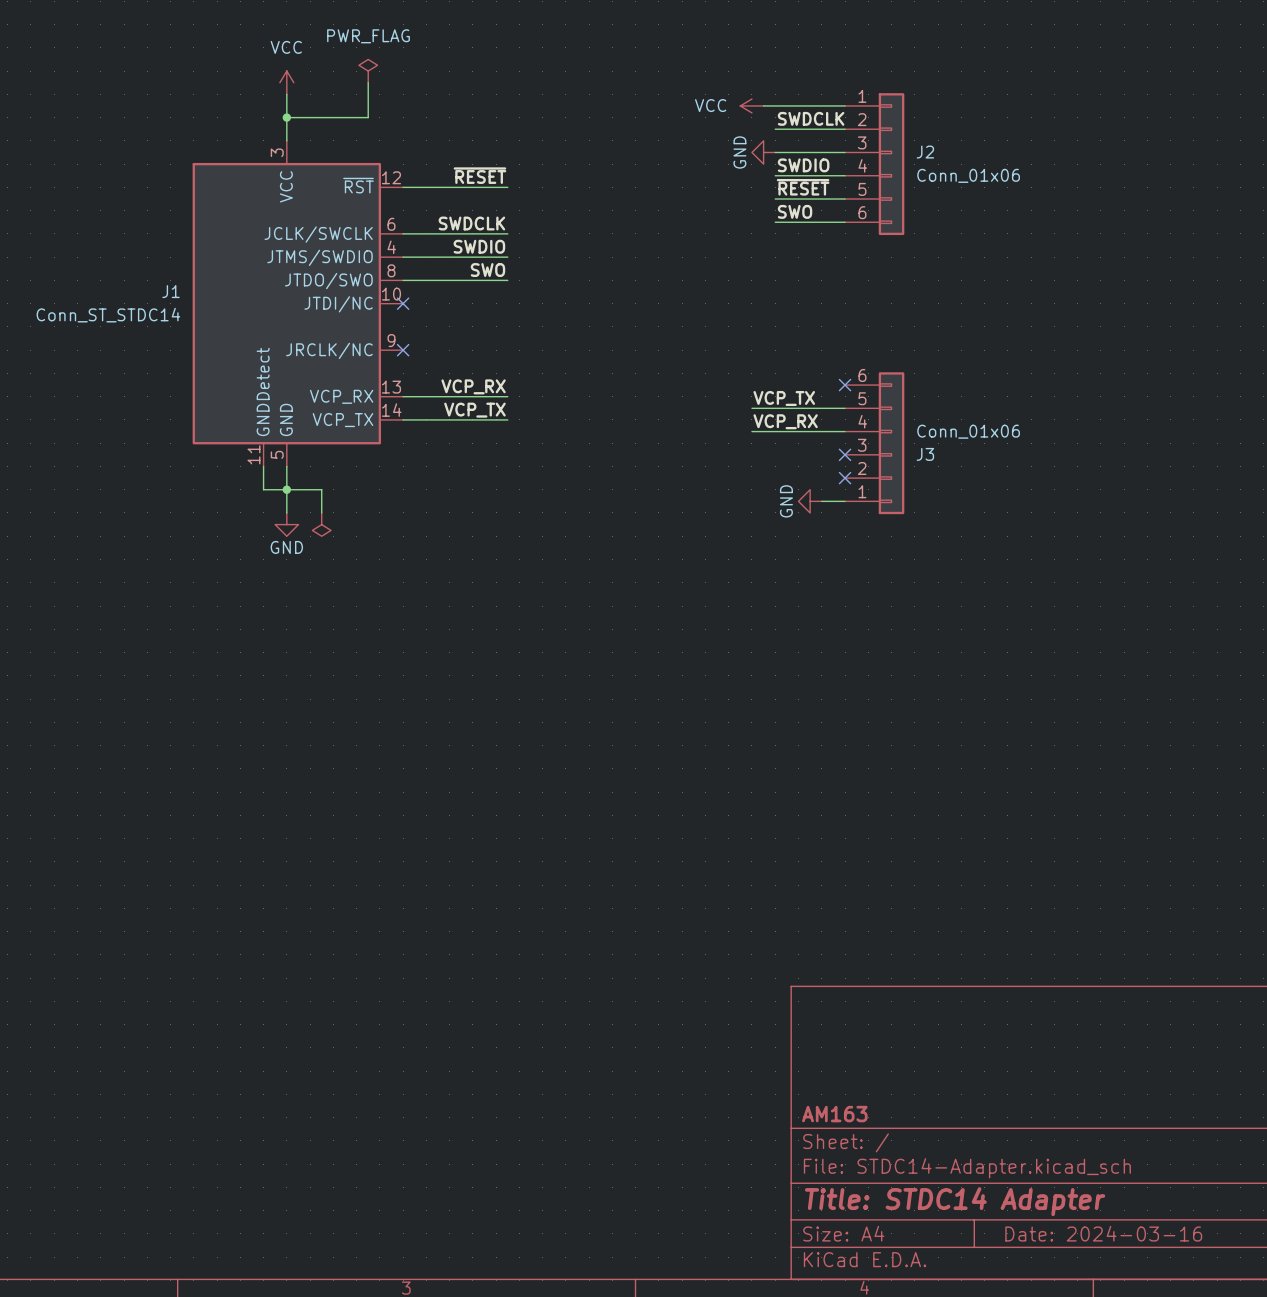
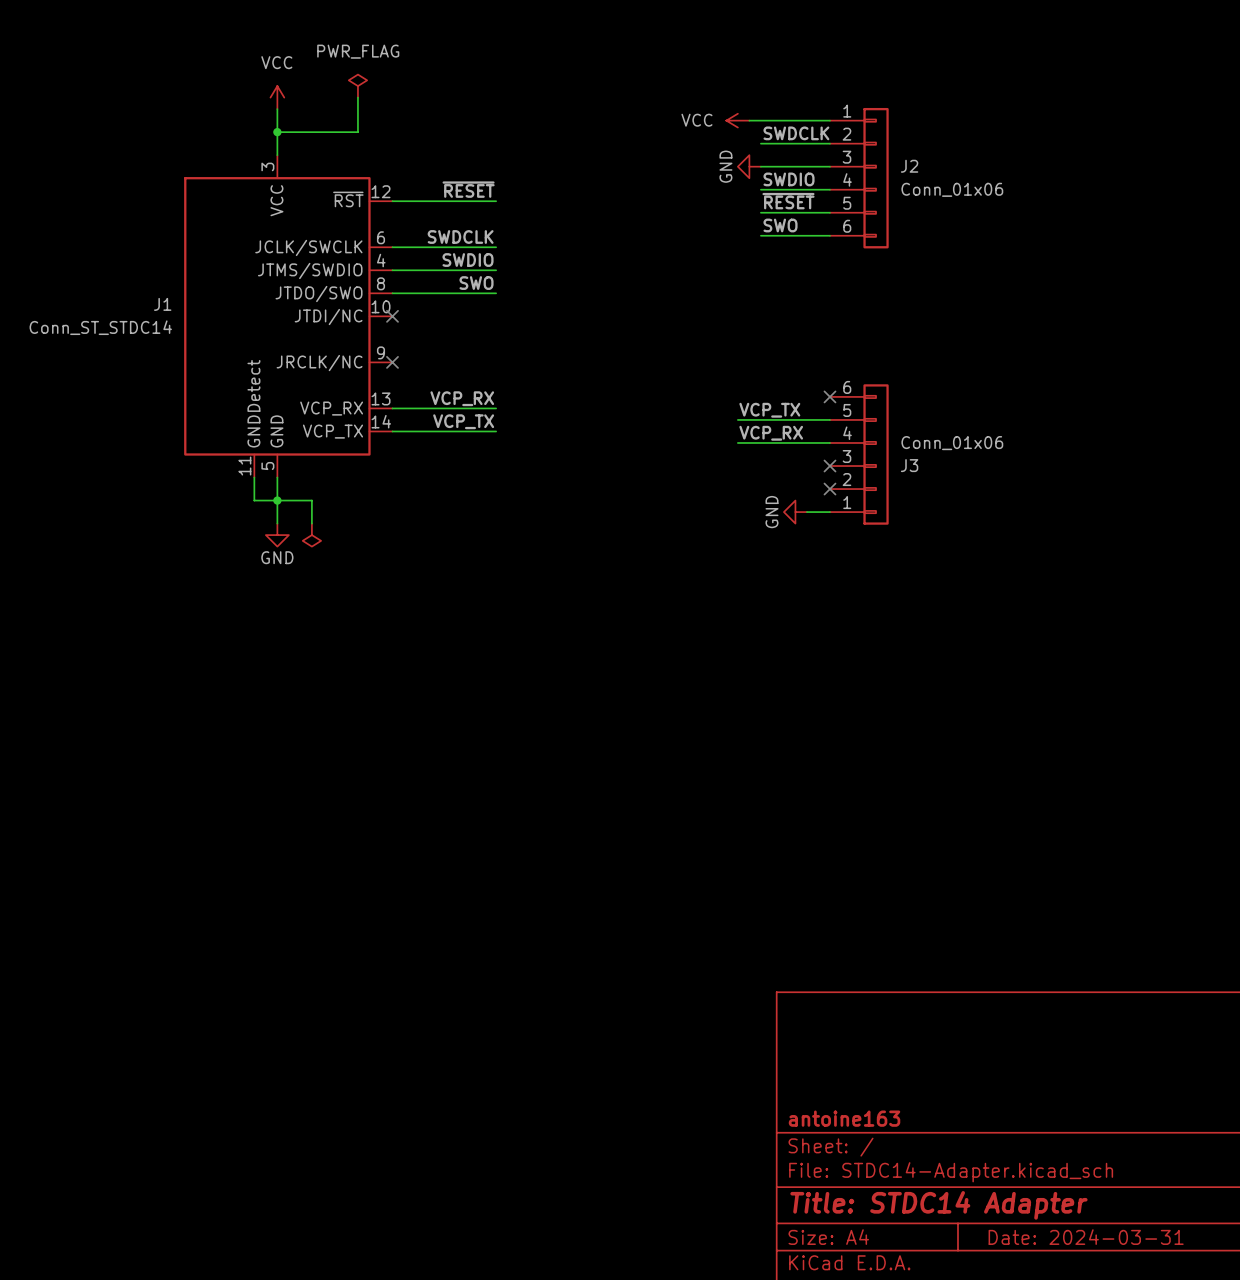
title block: AM163 (834, 1114) -> antoine163 (844, 1118)
title block: Date: 2024-03-16 (1103, 1233) -> Date: 2024-03-31 (1086, 1237)

